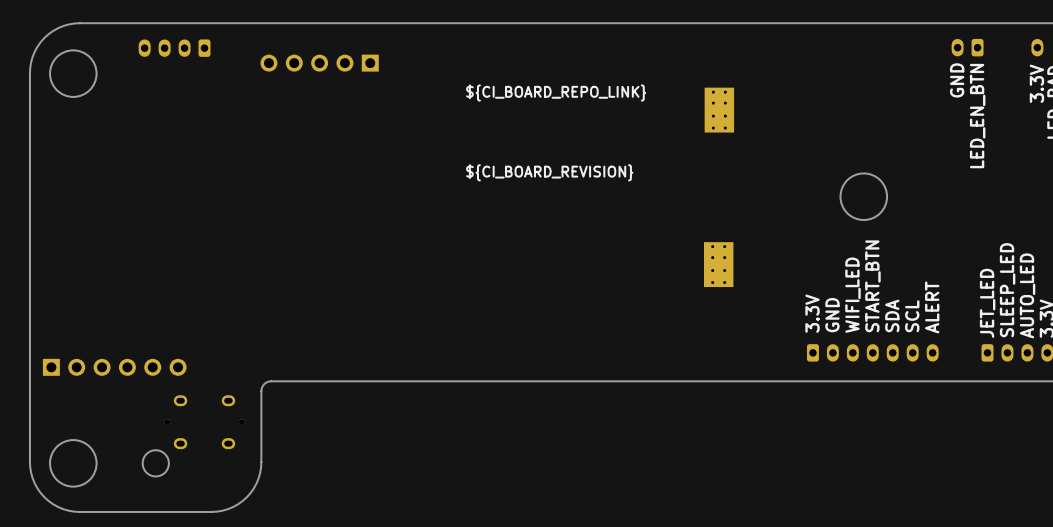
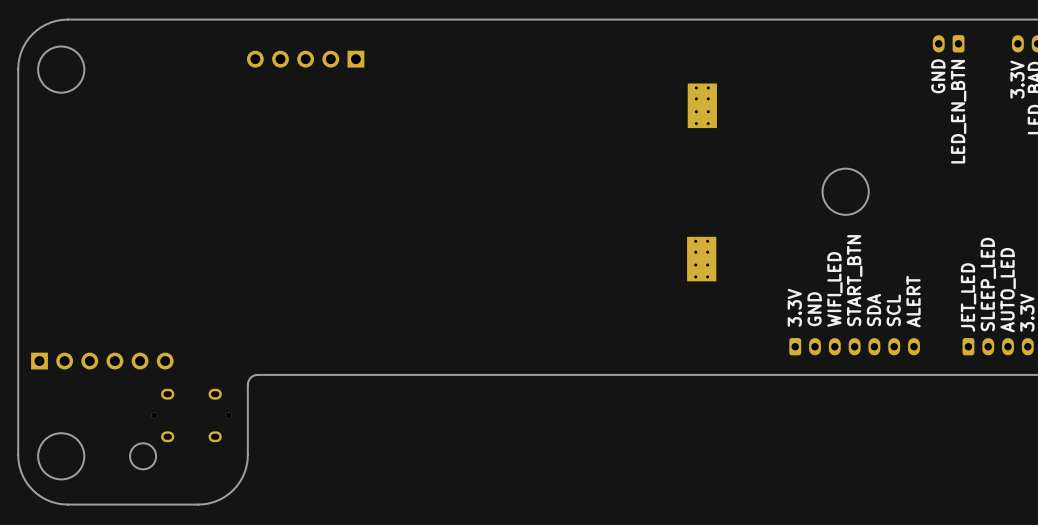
part: (174, 48) -> none
text: ${CI_BOARD_REPO_LINK} (556, 93) -> none
text: ${CI_BOARD_REVISION} (549, 172) -> none

